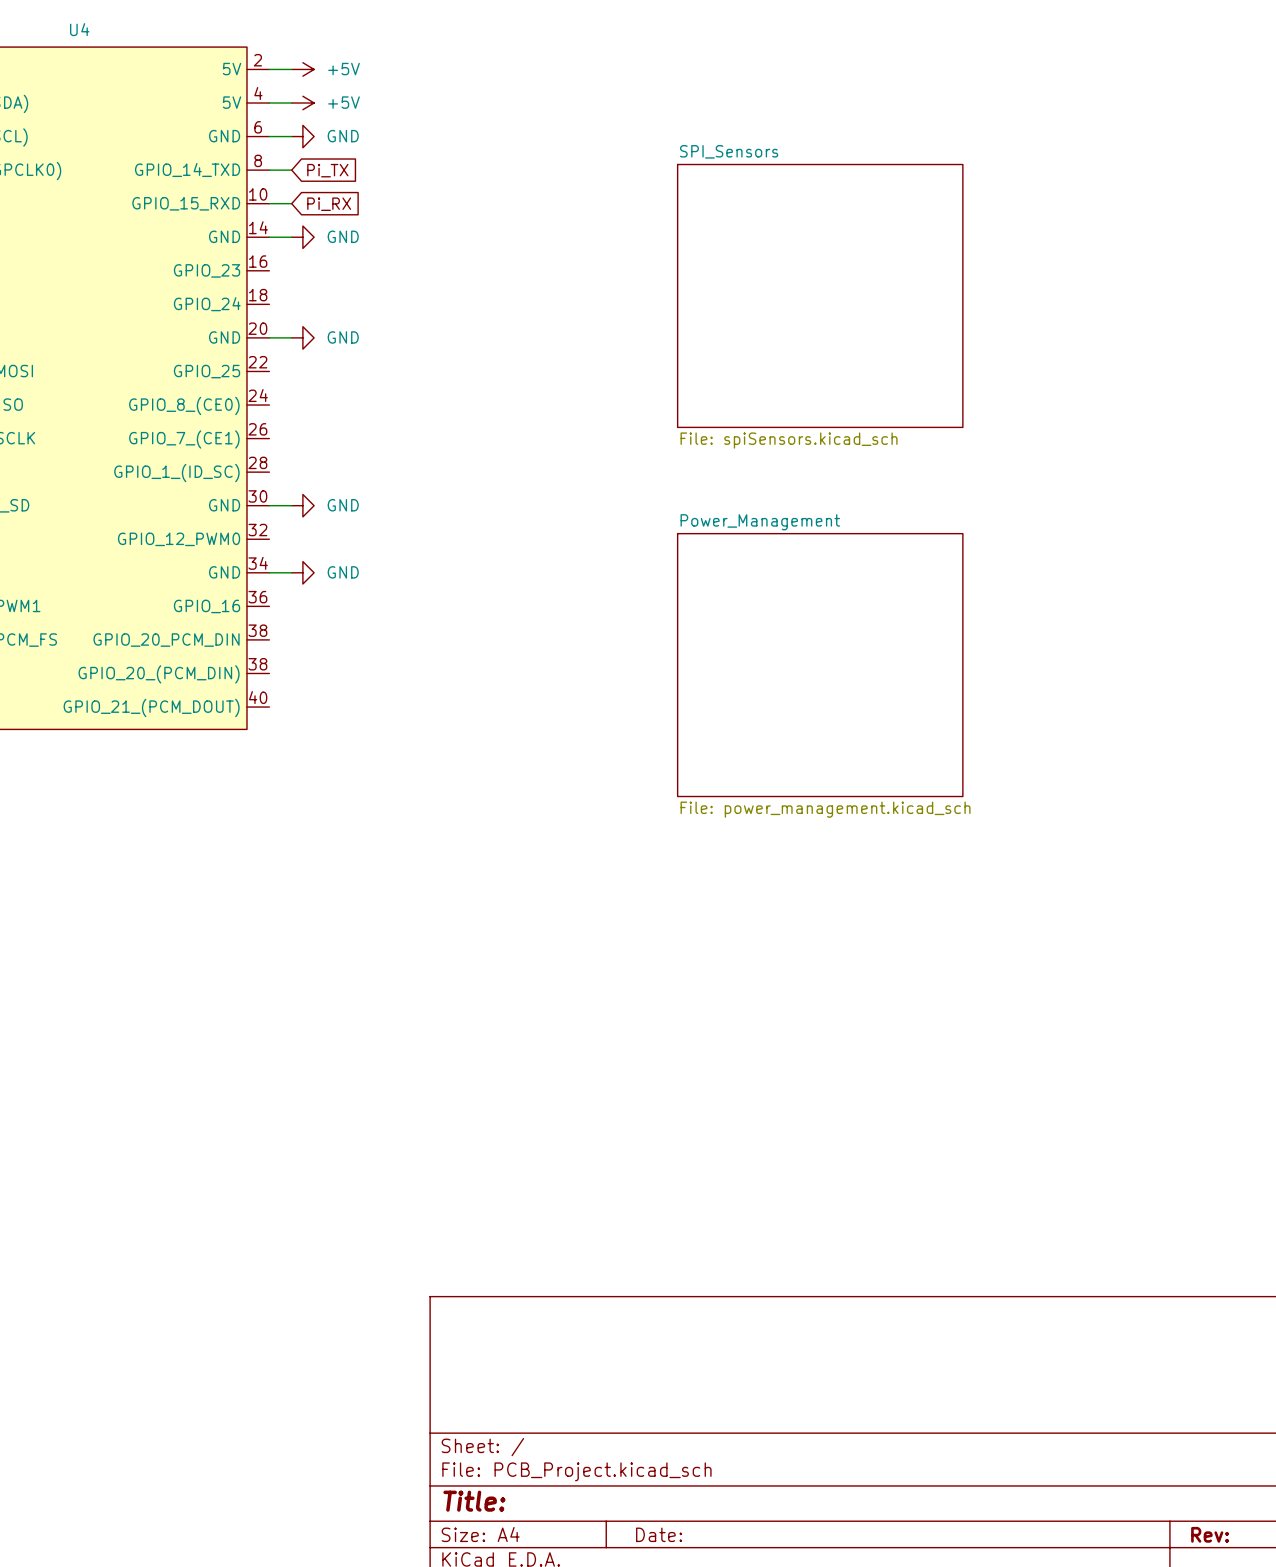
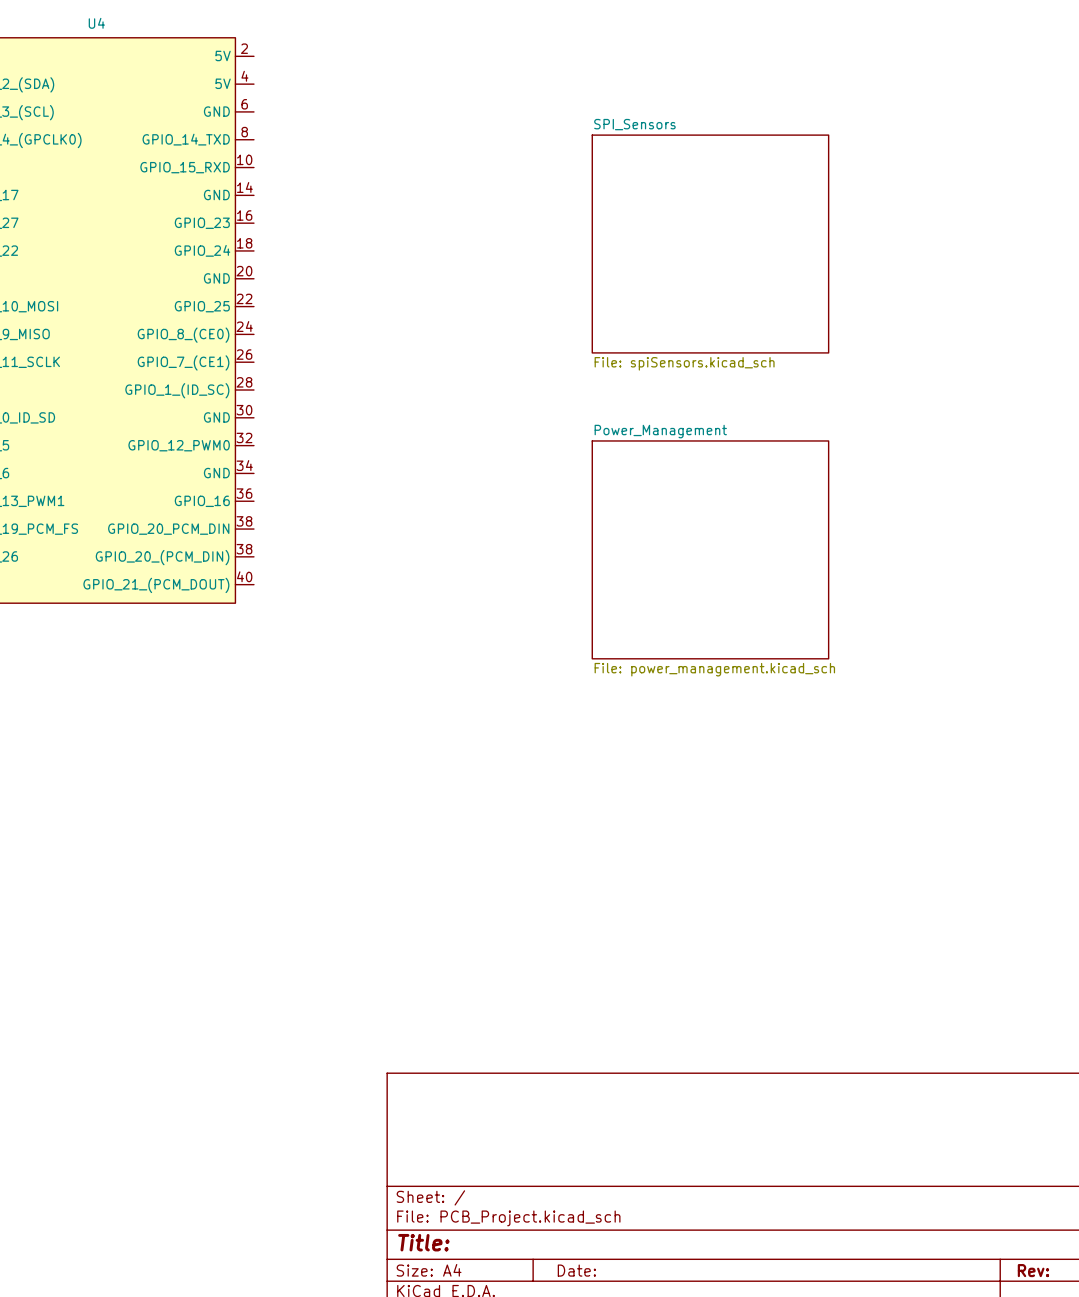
wire: (269, 69) (291, 69) -> none
power symbol: +5V (302, 69) -> none
wire: (269, 103) (291, 103) -> none
power symbol: +5V (302, 103) -> none
wire: (269, 136) (291, 136) -> none
power symbol: GND (302, 136) -> none
wire: (269, 170) (291, 170) -> none
global label: Pi_TX (327, 170) -> none
wire: (269, 203) (291, 203) -> none
global label: Pi_RX (329, 204) -> none
wire: (269, 237) (291, 237) -> none
power symbol: GND (302, 237) -> none
wire: (269, 337) (291, 337) -> none
power symbol: GND (302, 337) -> none
wire: (269, 505) (291, 505) -> none
power symbol: GND (302, 505) -> none
wire: (269, 572) (291, 572) -> none
power symbol: GND (302, 572) -> none

